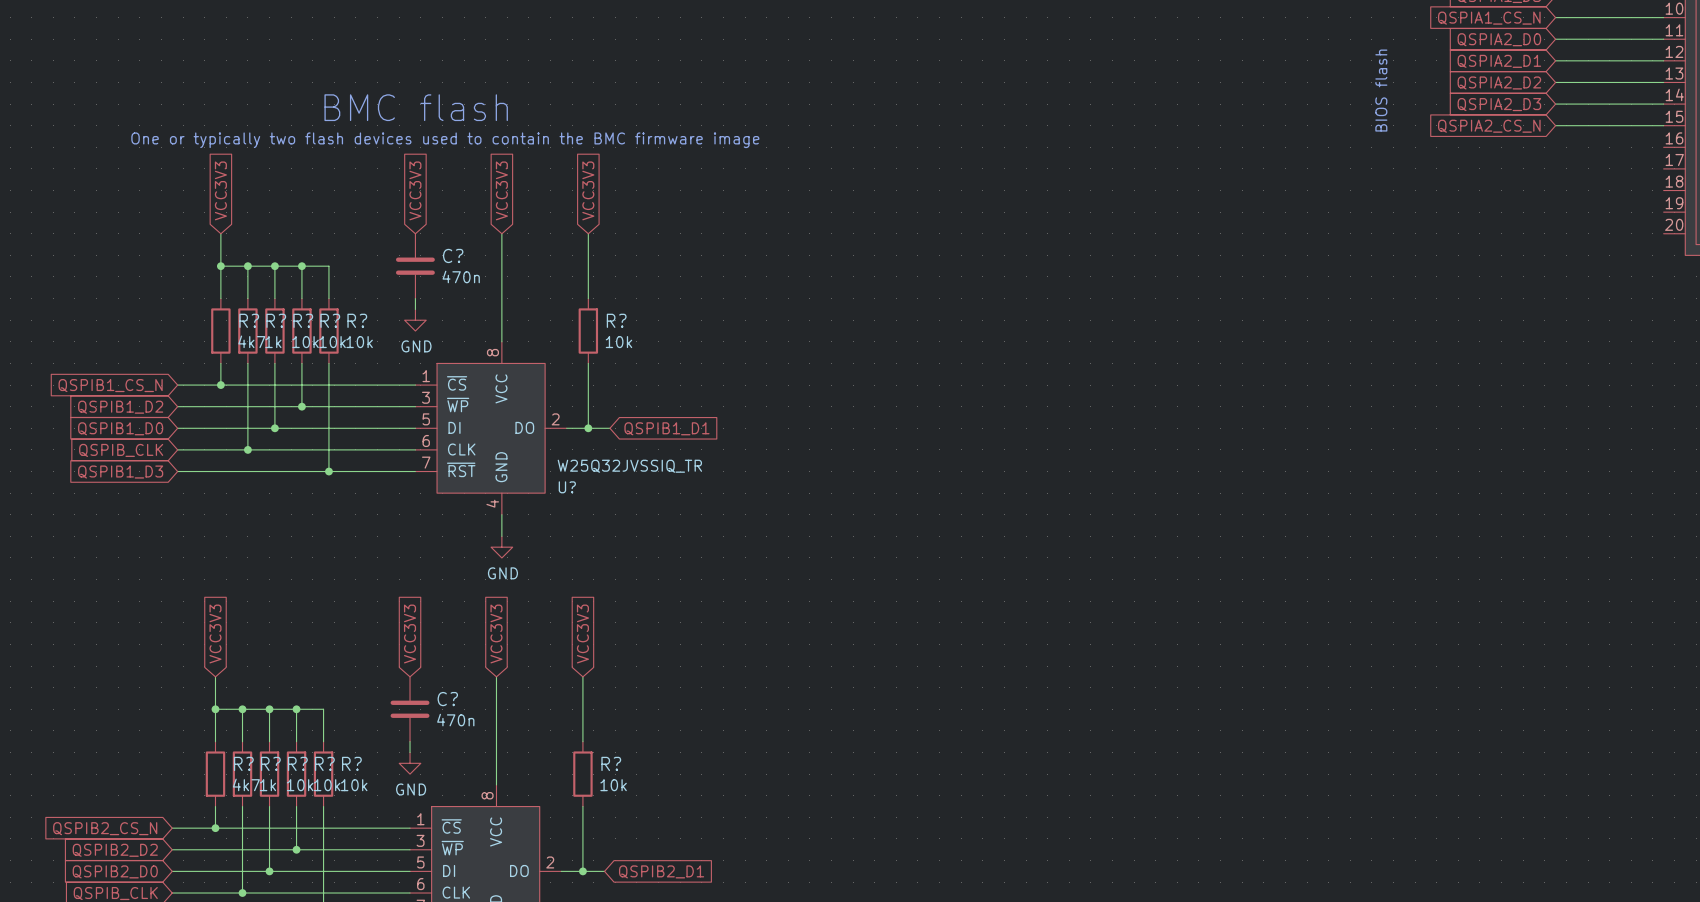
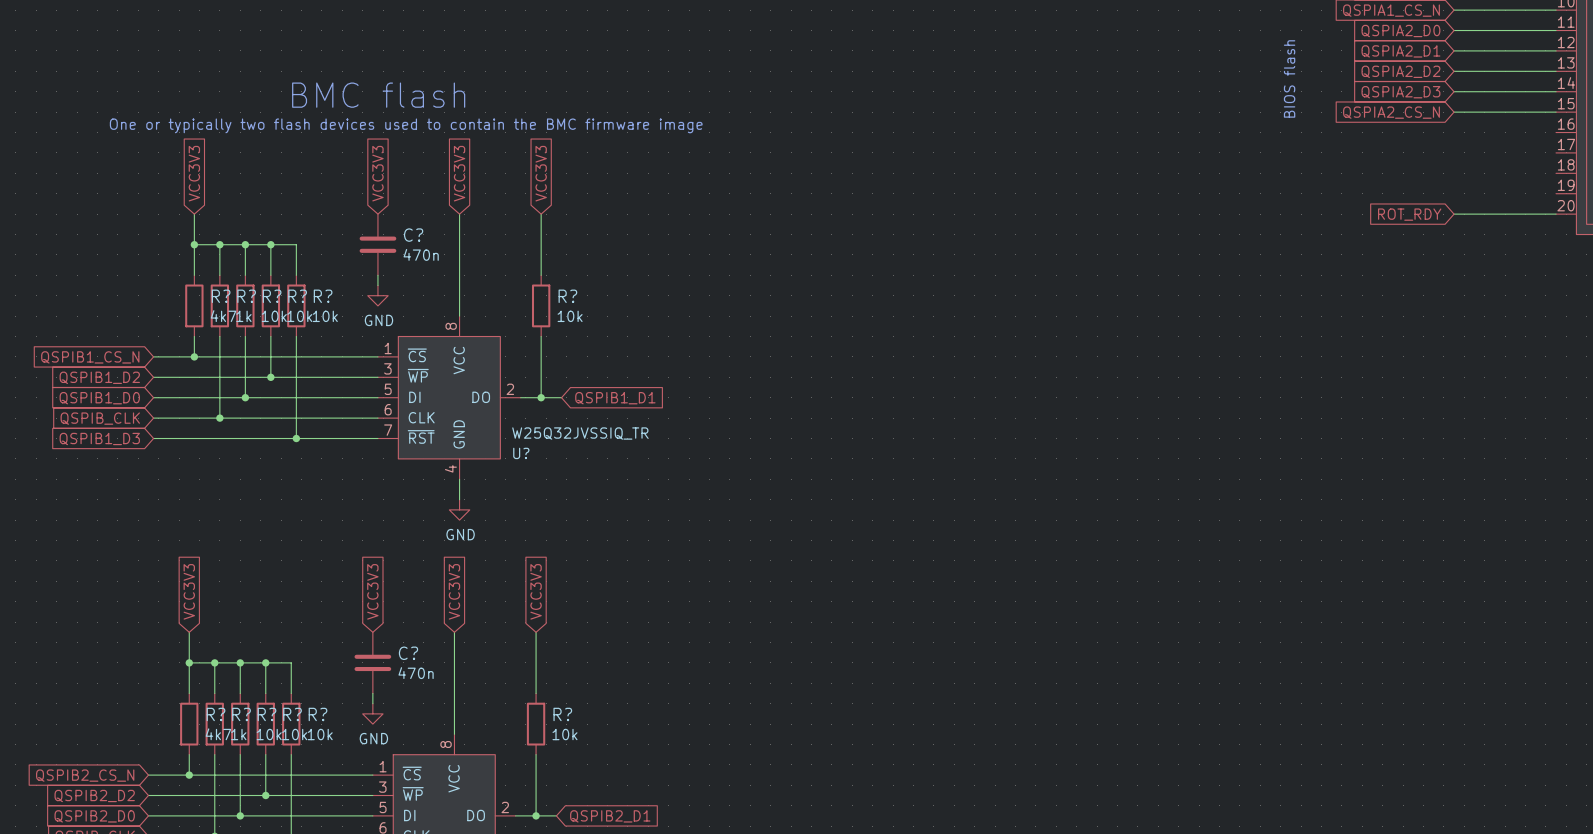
wire: none -> (1454, 214) (1556, 214)
global label: none -> ROT_RDY (1409, 214)

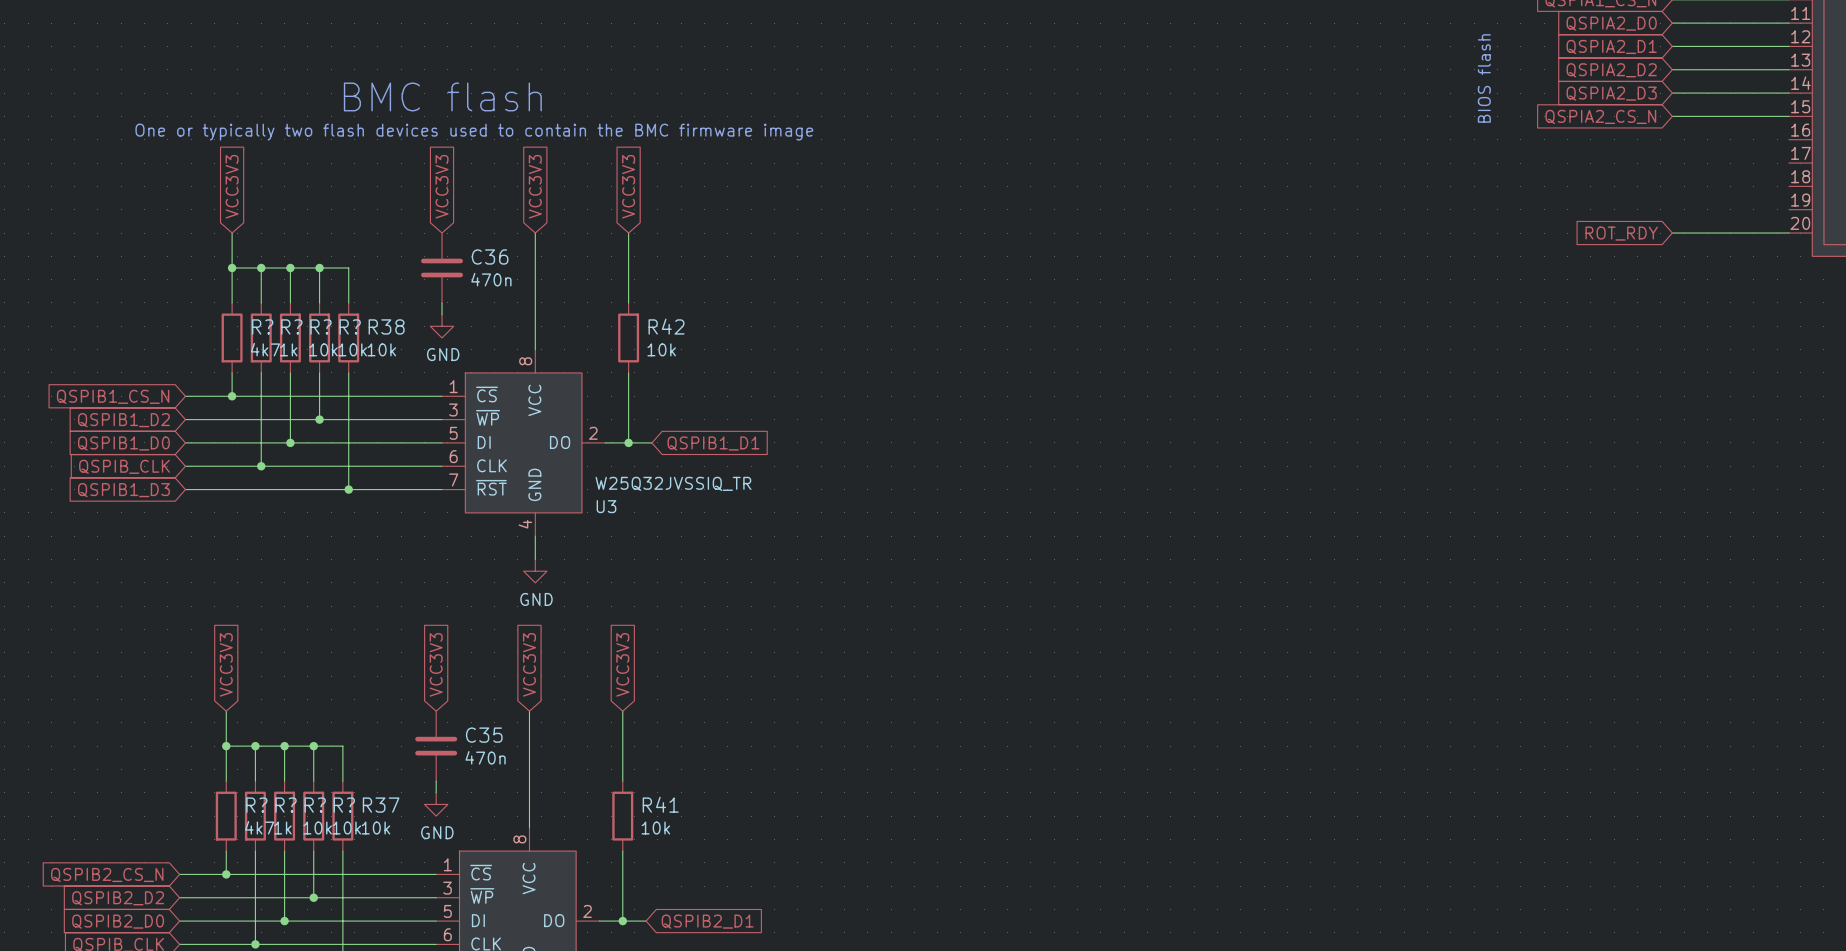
C? name: C? (413, 235) -> C36 (490, 256)
R? name: R? (323, 296) -> R38 (386, 326)
R? name: R? (567, 296) -> R42 (666, 326)
U? name: U? (521, 453) -> U3 (606, 506)
C? name: C? (408, 653) -> C35 (484, 735)
R? name: R? (318, 714) -> R37 (381, 805)
R? name: R? (562, 714) -> R41 (660, 804)

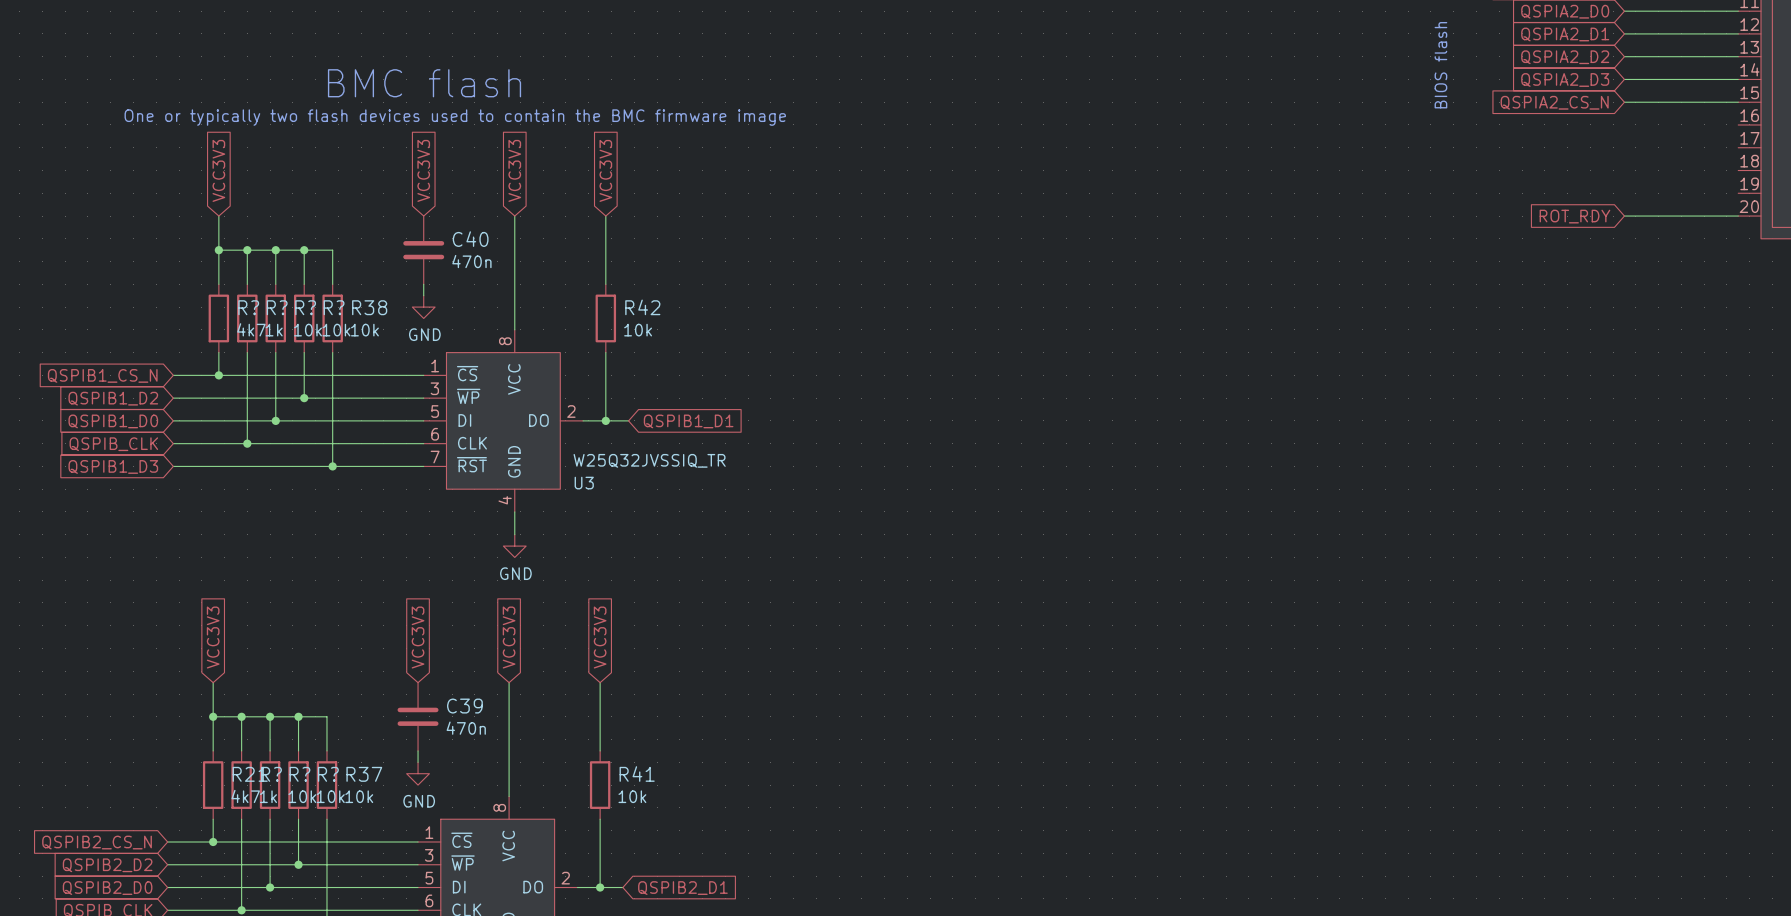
C36 name: C36 (490, 256) -> C40 (470, 239)
C35 name: C35 (484, 735) -> C39 (464, 706)
R? name: R? (256, 805) -> R21 (250, 774)

